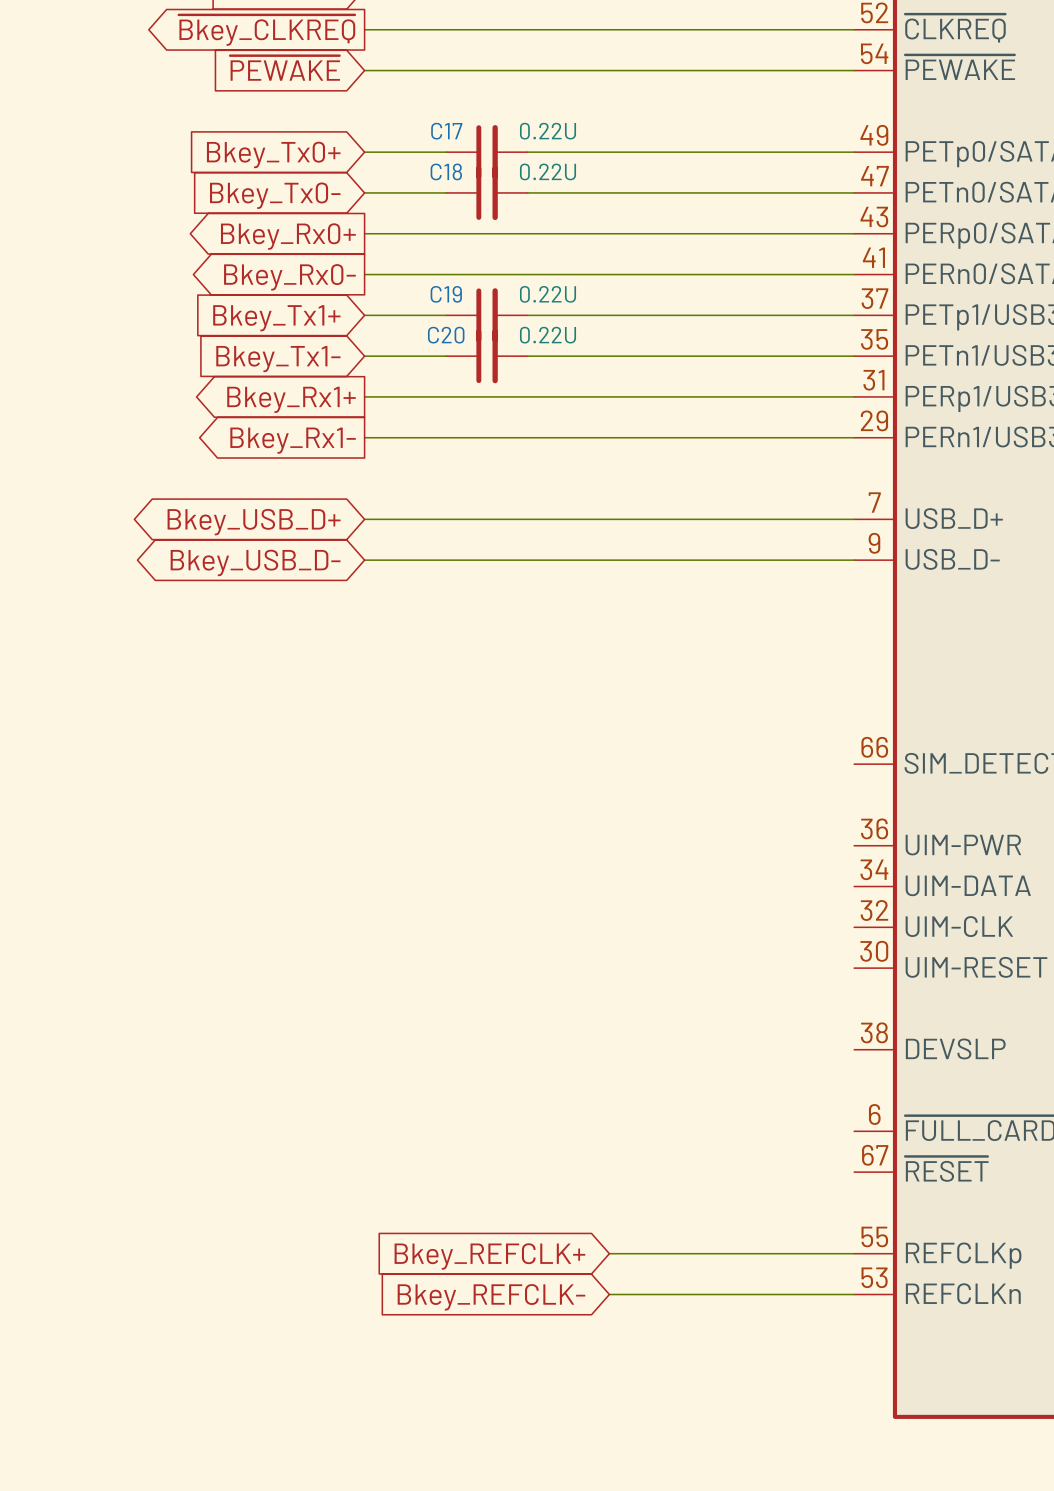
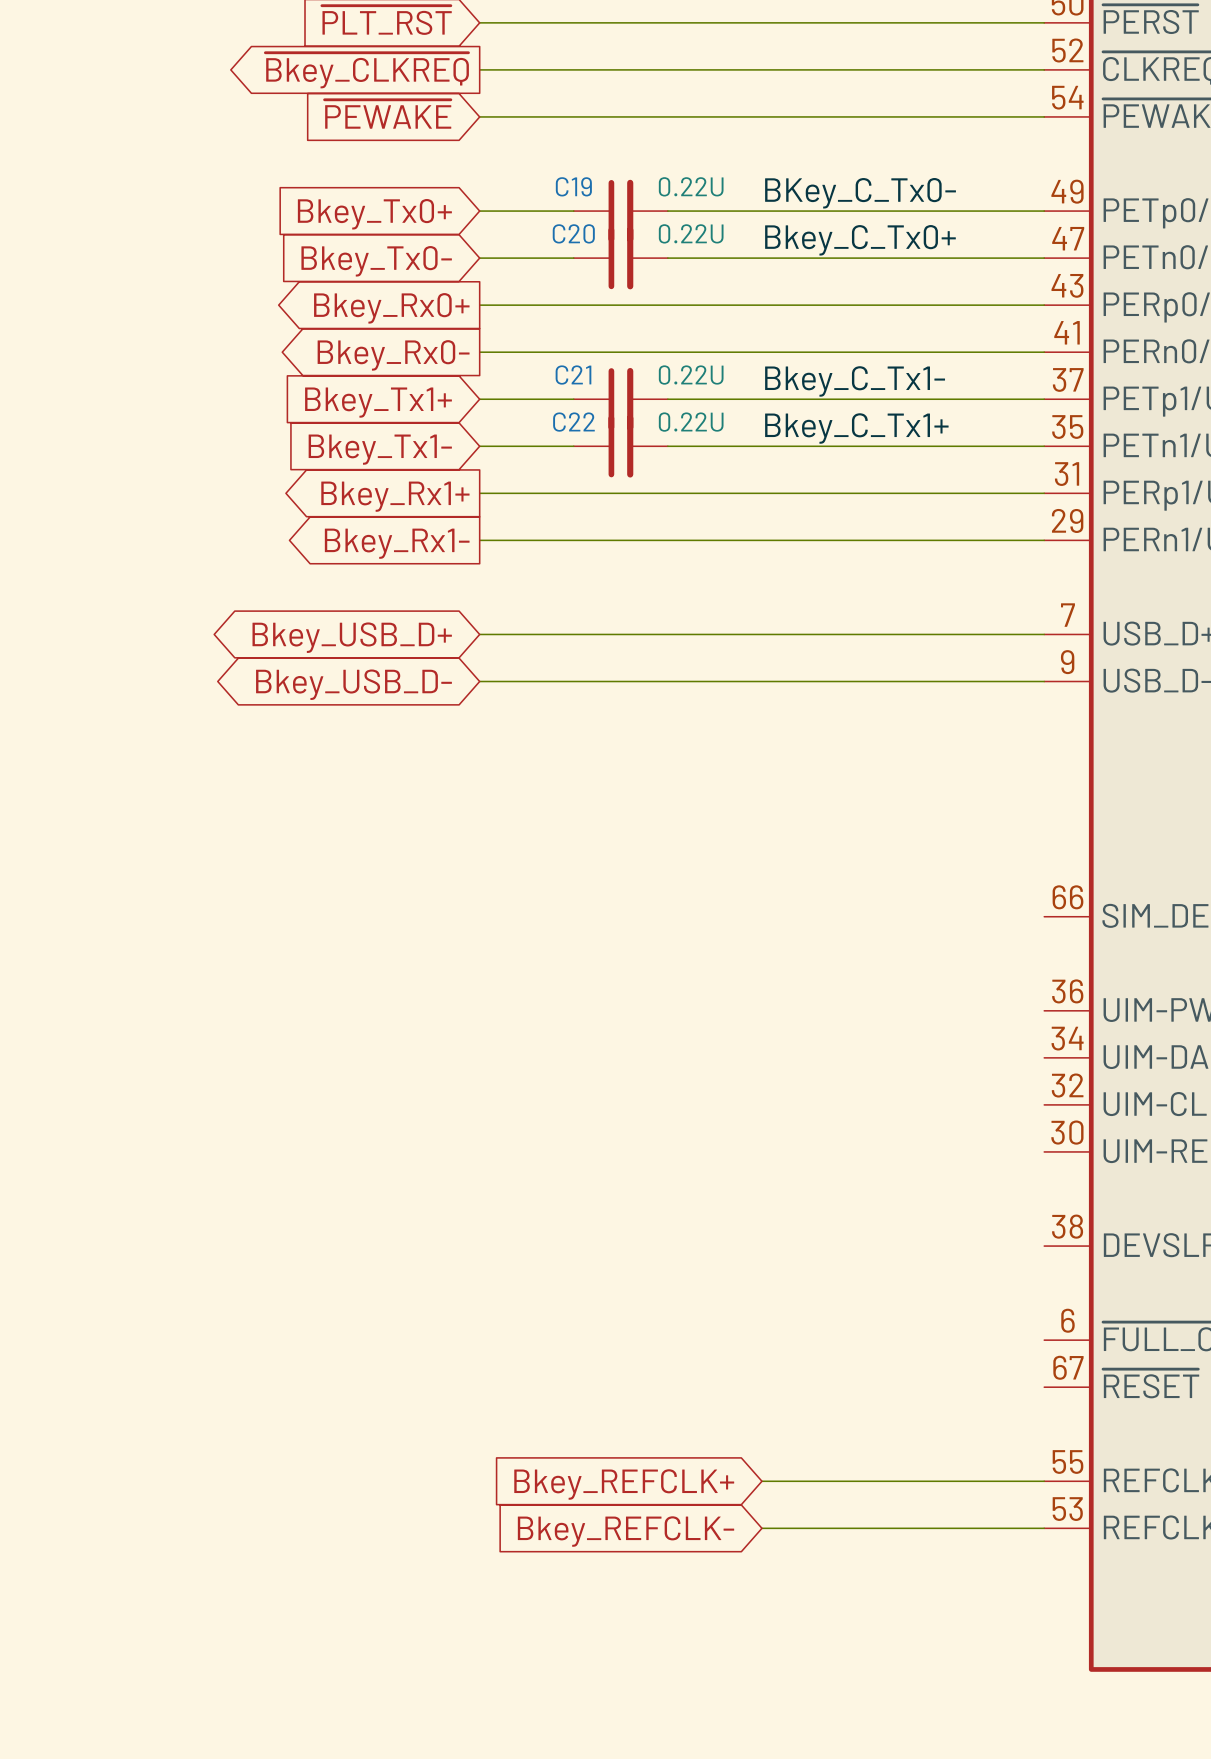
C17 name: C17 (446, 131) -> C19 (573, 186)
label: none -> BKey_C_Tx0- (860, 193)
C18 name: C18 (446, 171) -> C20 (573, 233)
label: none -> Bkey_C_Tx0+ (860, 240)
C19 name: C19 (446, 294) -> C21 (573, 375)
label: none -> Bkey_C_Tx1- (855, 381)
C20 name: C20 (446, 335) -> C22 (573, 422)
label: none -> Bkey_C_Tx1+ (856, 428)

